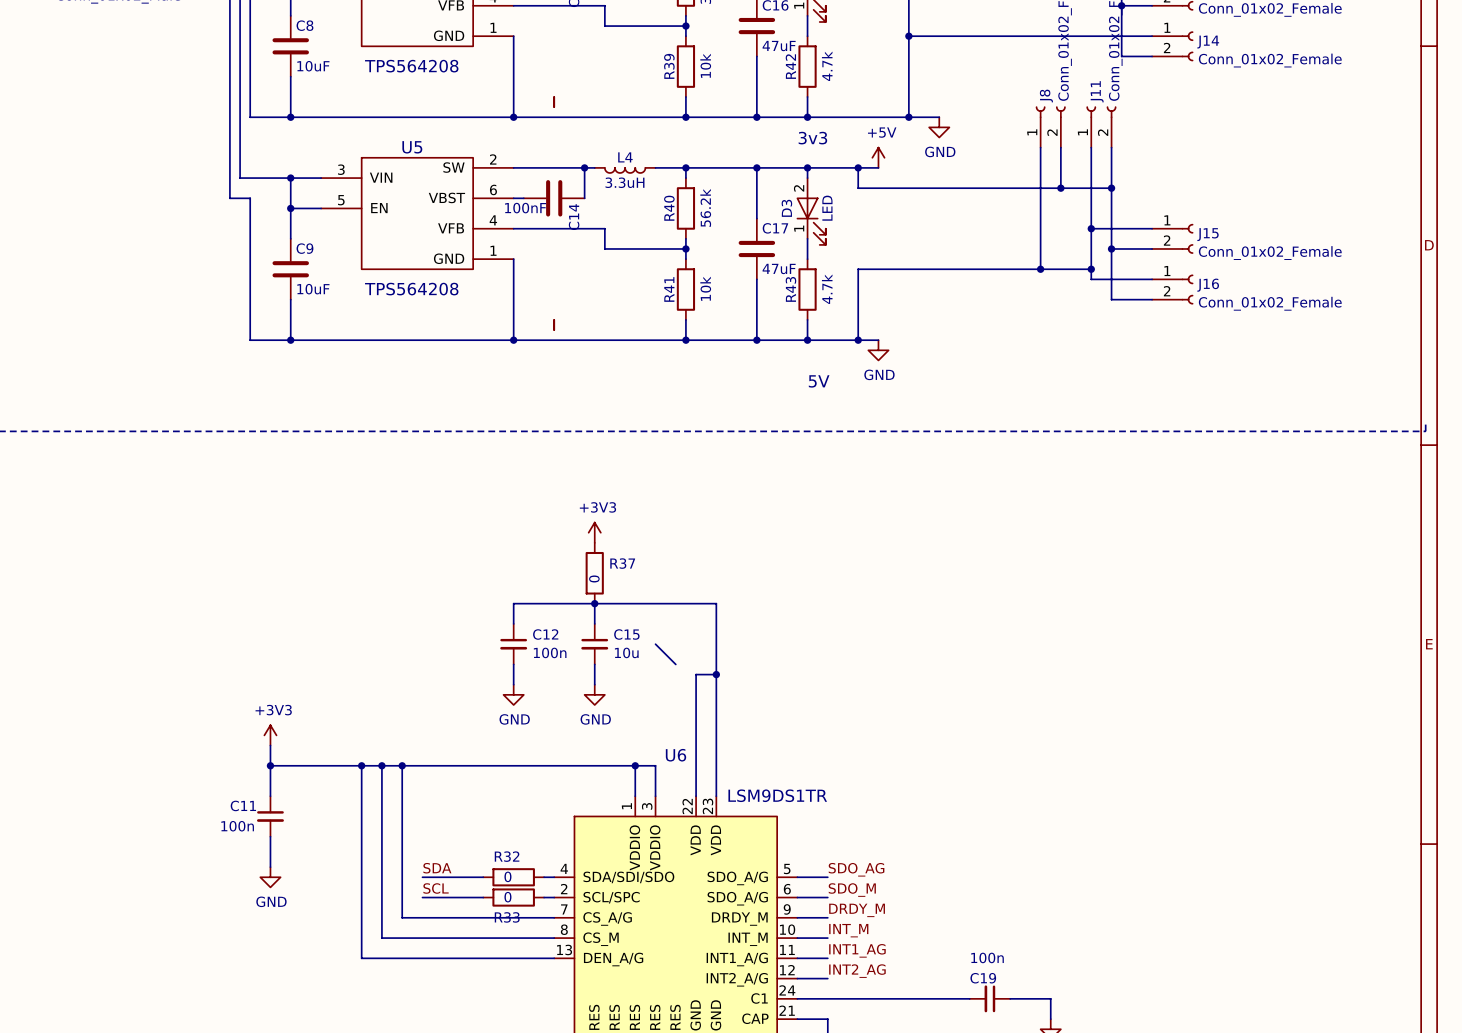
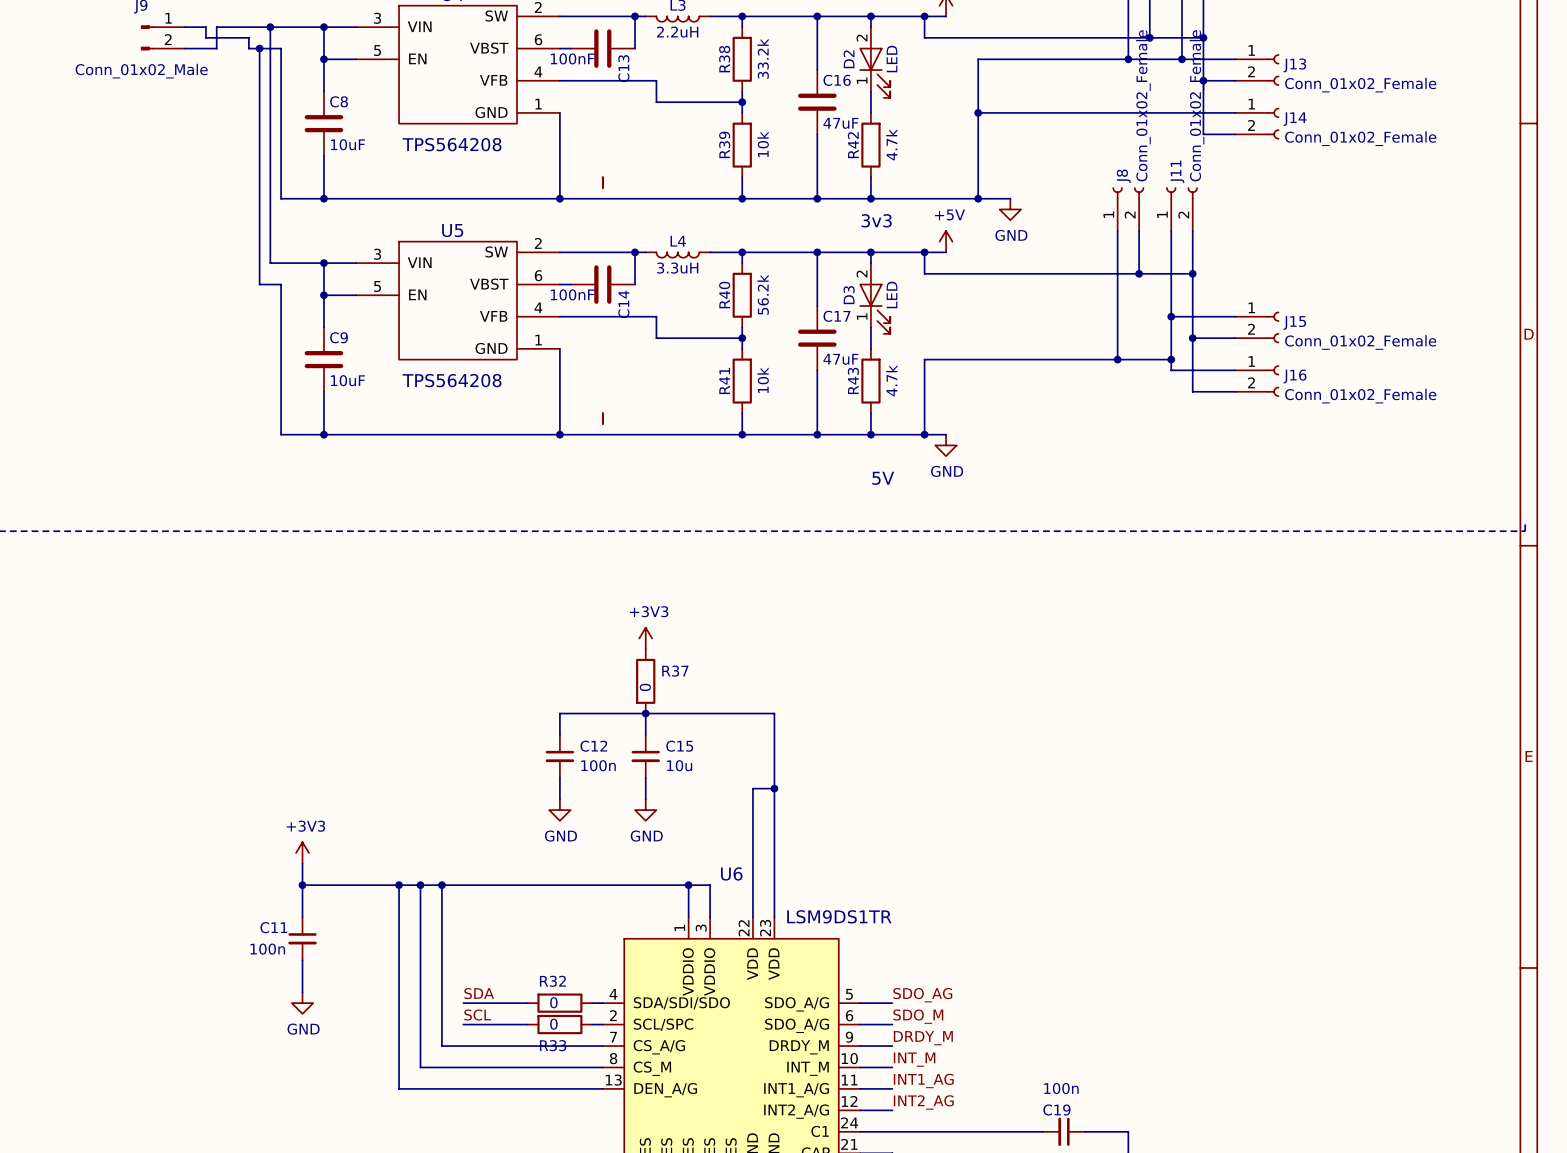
wire: (655, 644) (675, 664) -> none

